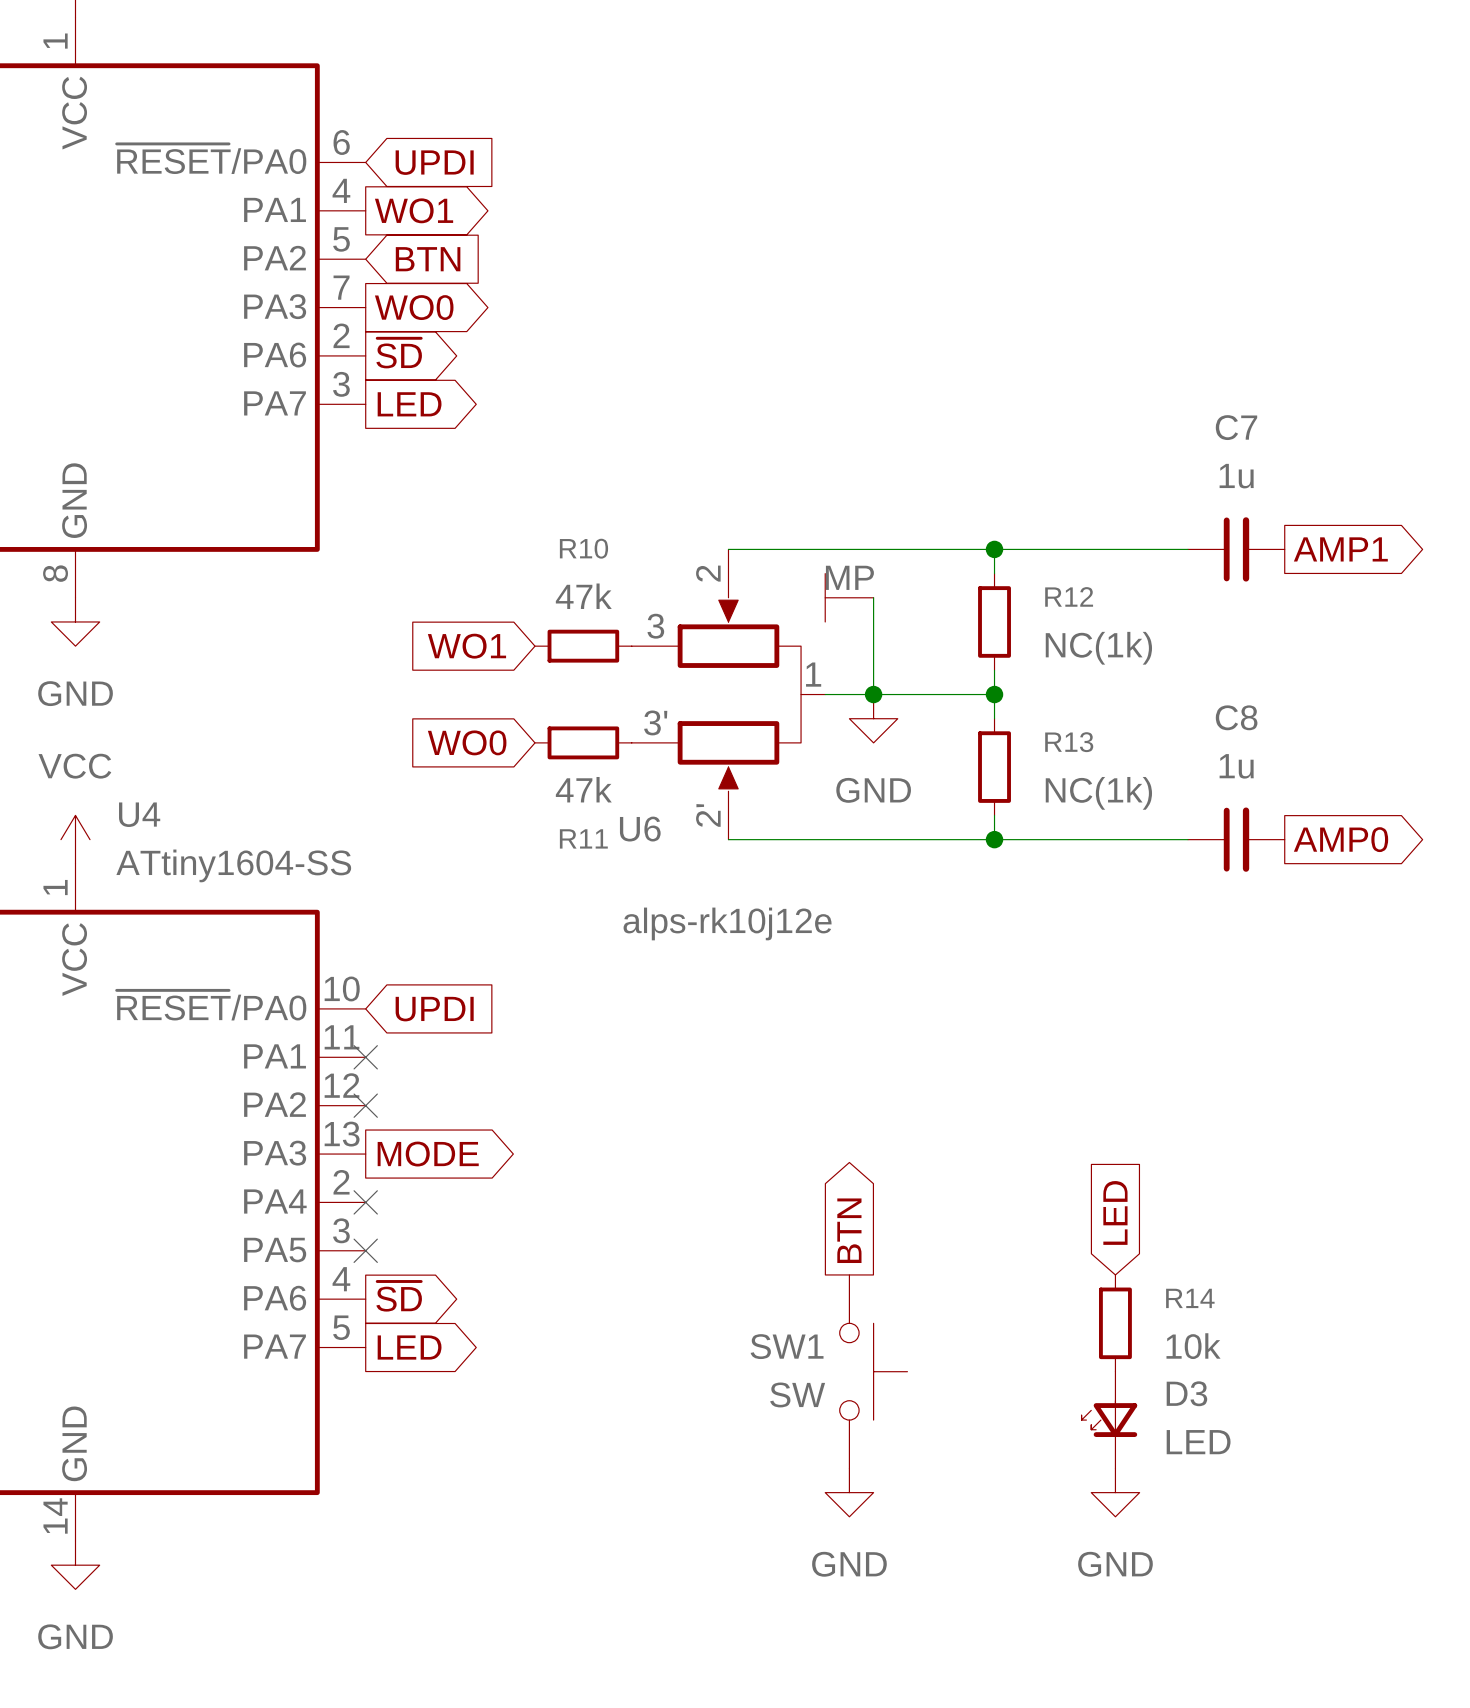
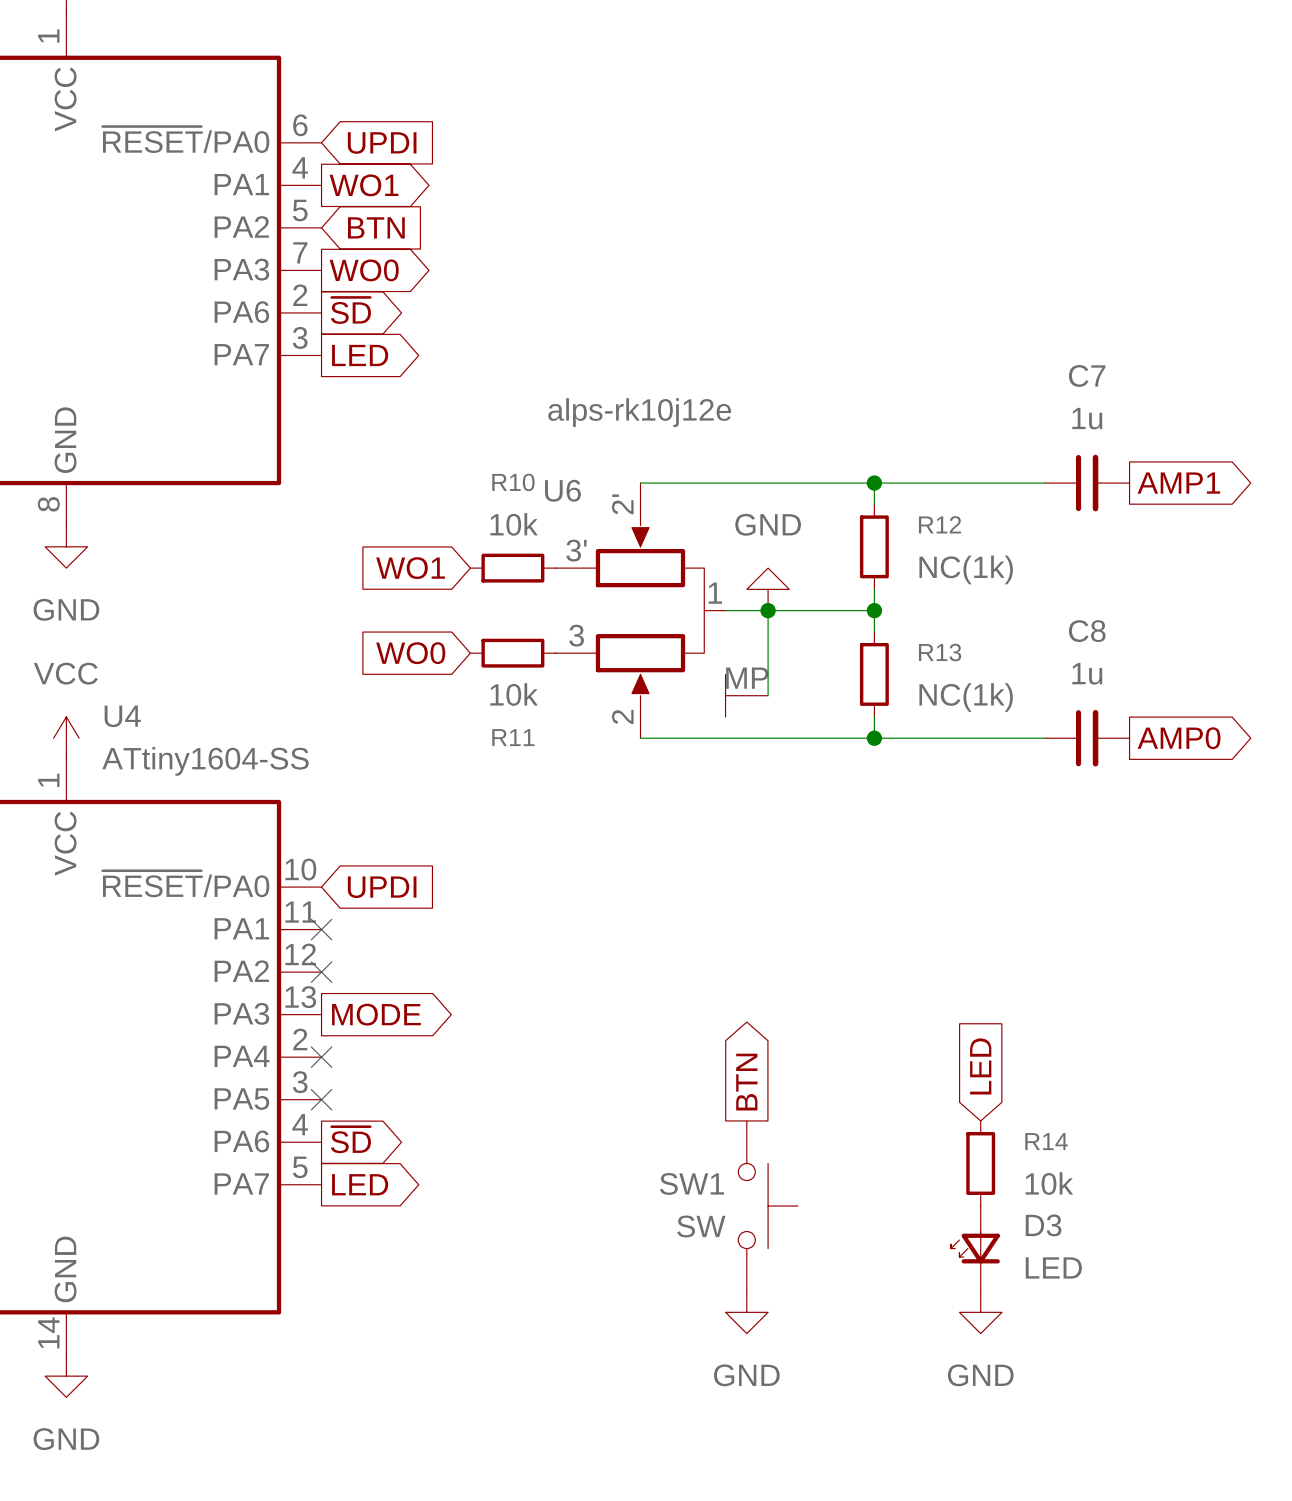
R10 value: 47k (583, 596) -> 10k (514, 524)
wire: (873, 597) (873, 694) -> (768, 695) (768, 610)
U6 flip: as is (751, 681) -> up-down (660, 622)
power symbol rotation: 0° (873, 718) -> 180° (768, 589)
power symbol position: GND (873, 718) -> GND (768, 589)
R11 value: 47k (583, 789) -> 10k (514, 694)

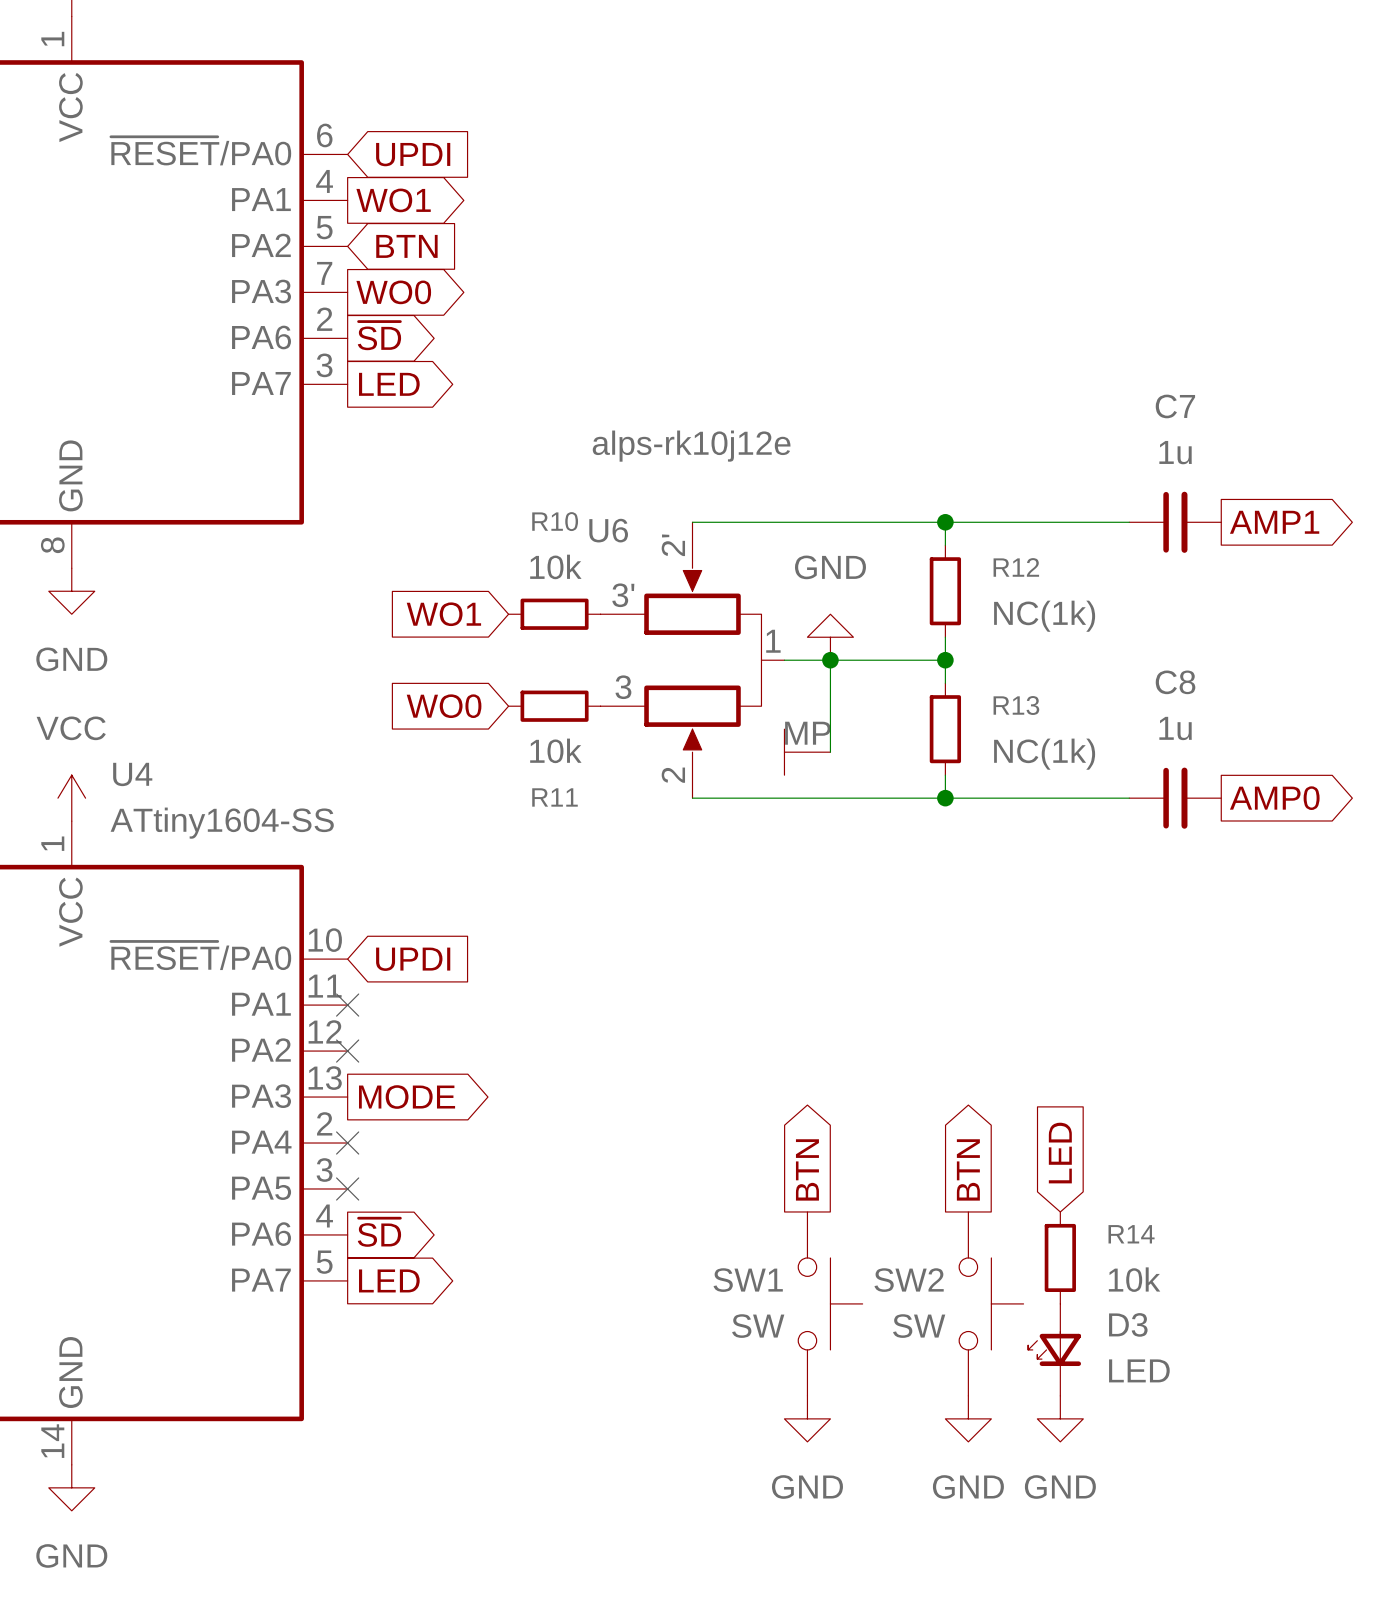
global label: none -> BTN (968, 1169)
SW2: none -> SW (991, 1303)
power symbol: none -> GND (968, 1418)

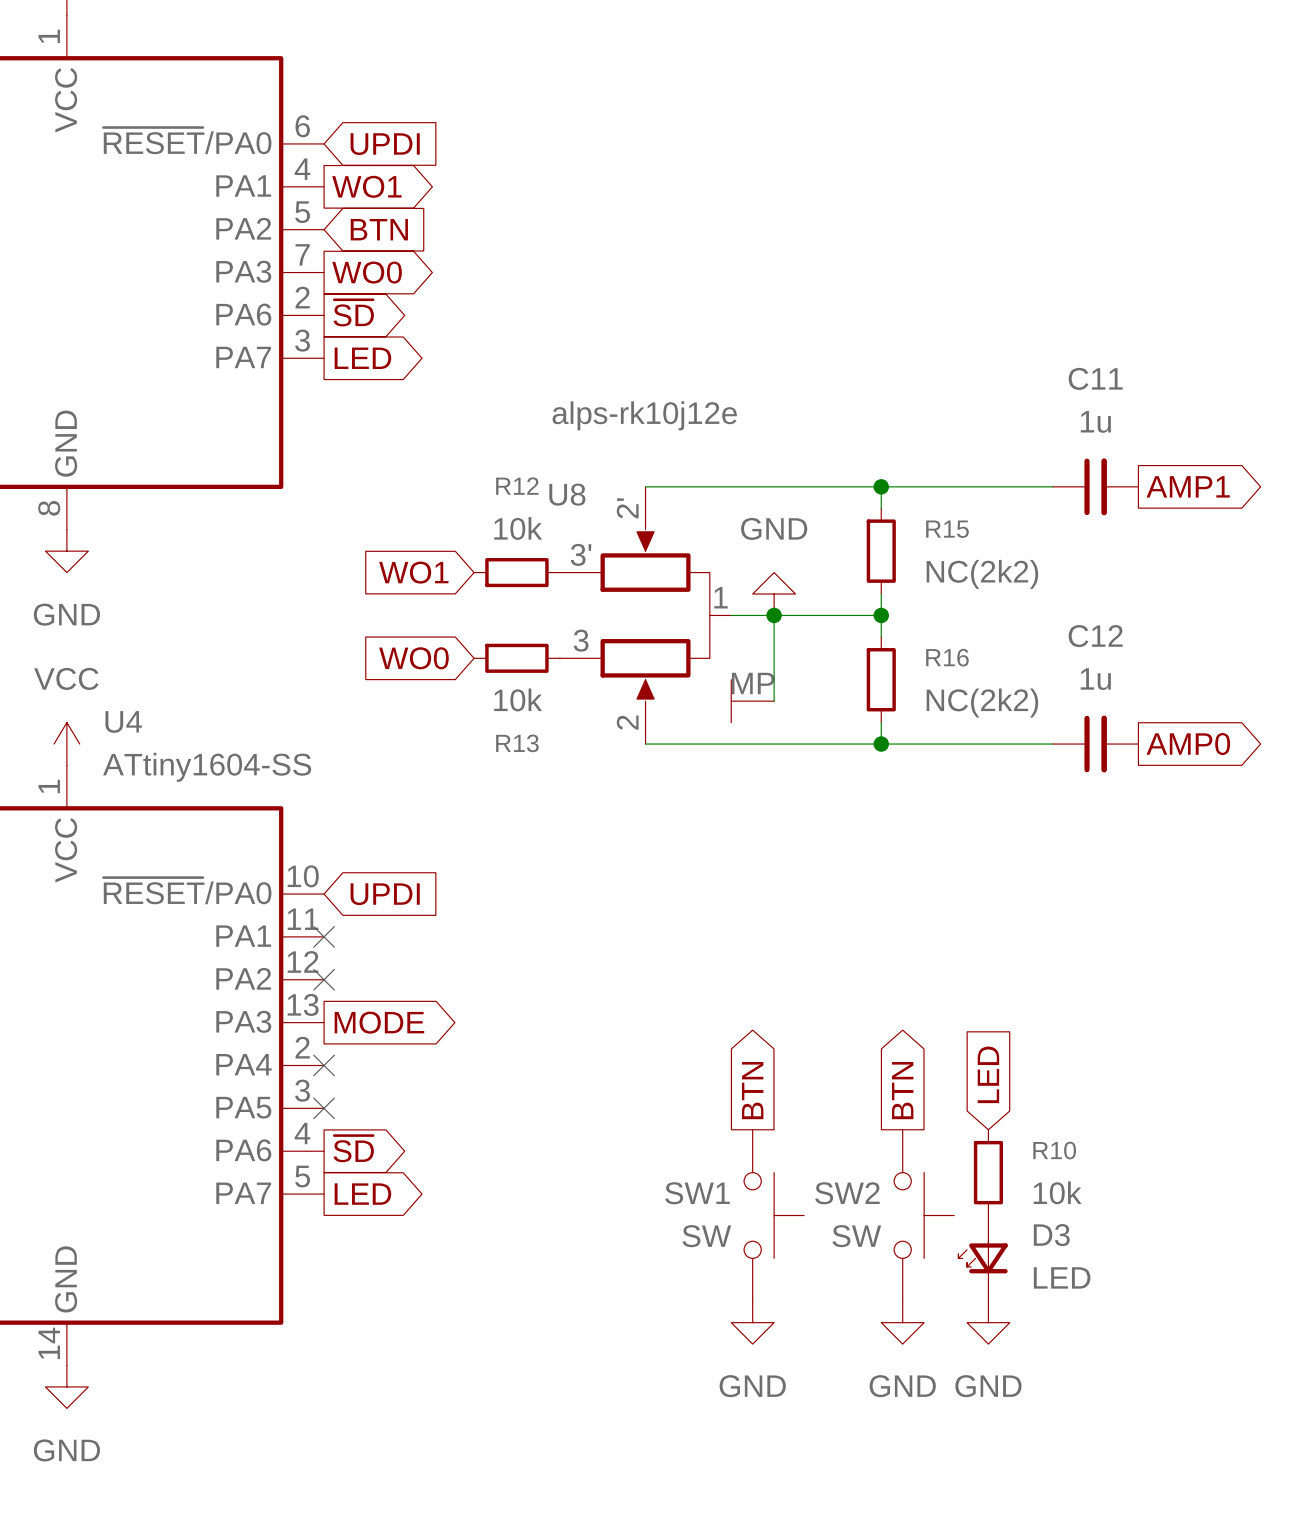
C7 name: C7 (1175, 406) -> C11 (1095, 378)
R10 name: R10 (555, 521) -> R12 (517, 486)
U6 name: U6 (608, 530) -> U8 (567, 494)
R12 name: R12 (1016, 567) -> R15 (947, 529)
R12 value: NC(1k) (1044, 616) -> NC(2k2) (982, 574)
C8 name: C8 (1175, 682) -> C12 (1095, 636)
R13 name: R13 (1016, 705) -> R16 (947, 657)
R13 value: NC(1k) (1044, 754) -> NC(2k2) (982, 703)
R11 name: R11 (555, 797) -> R13 (517, 743)
R14 name: R14 (1131, 1234) -> R10 (1054, 1150)

